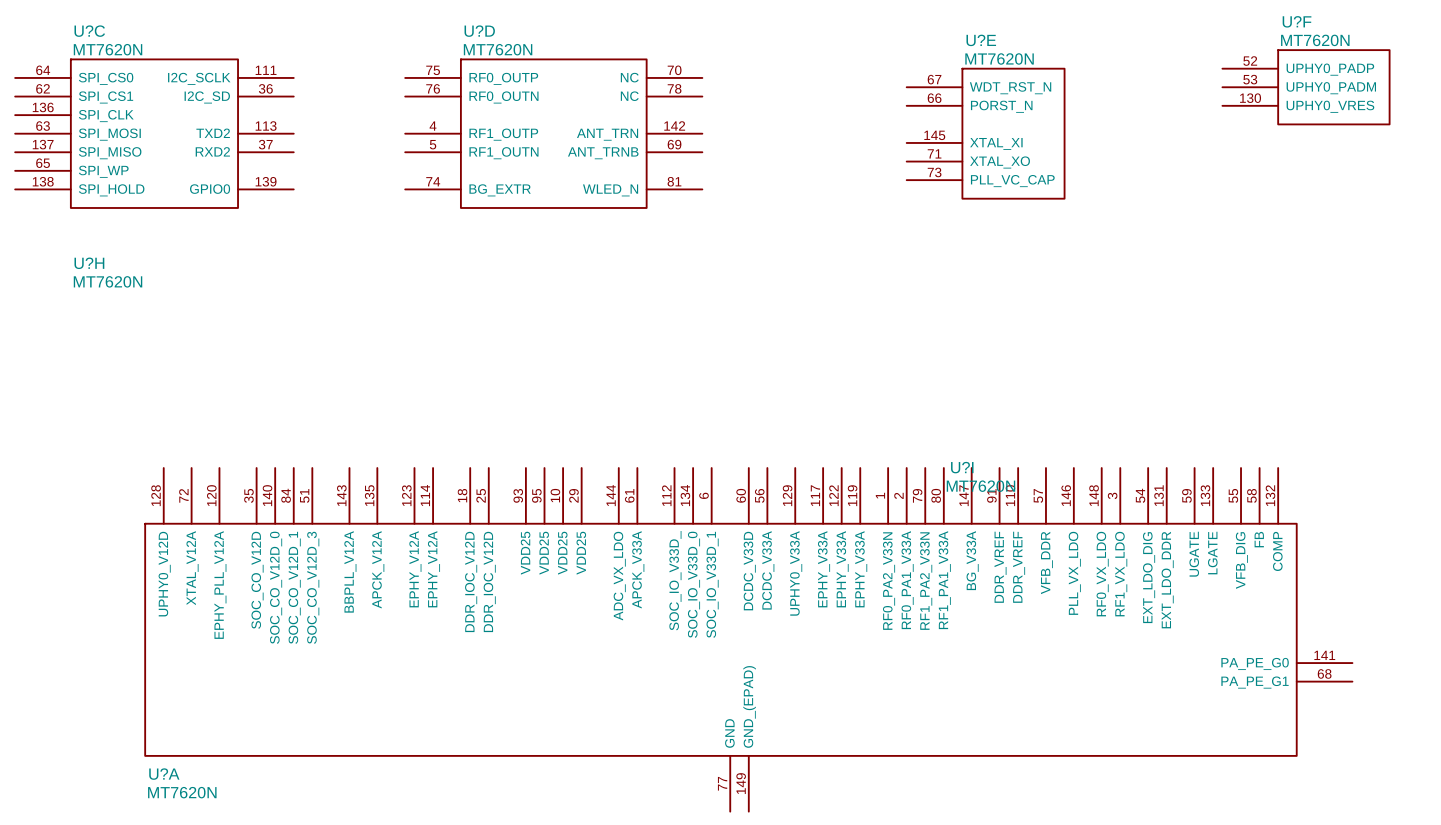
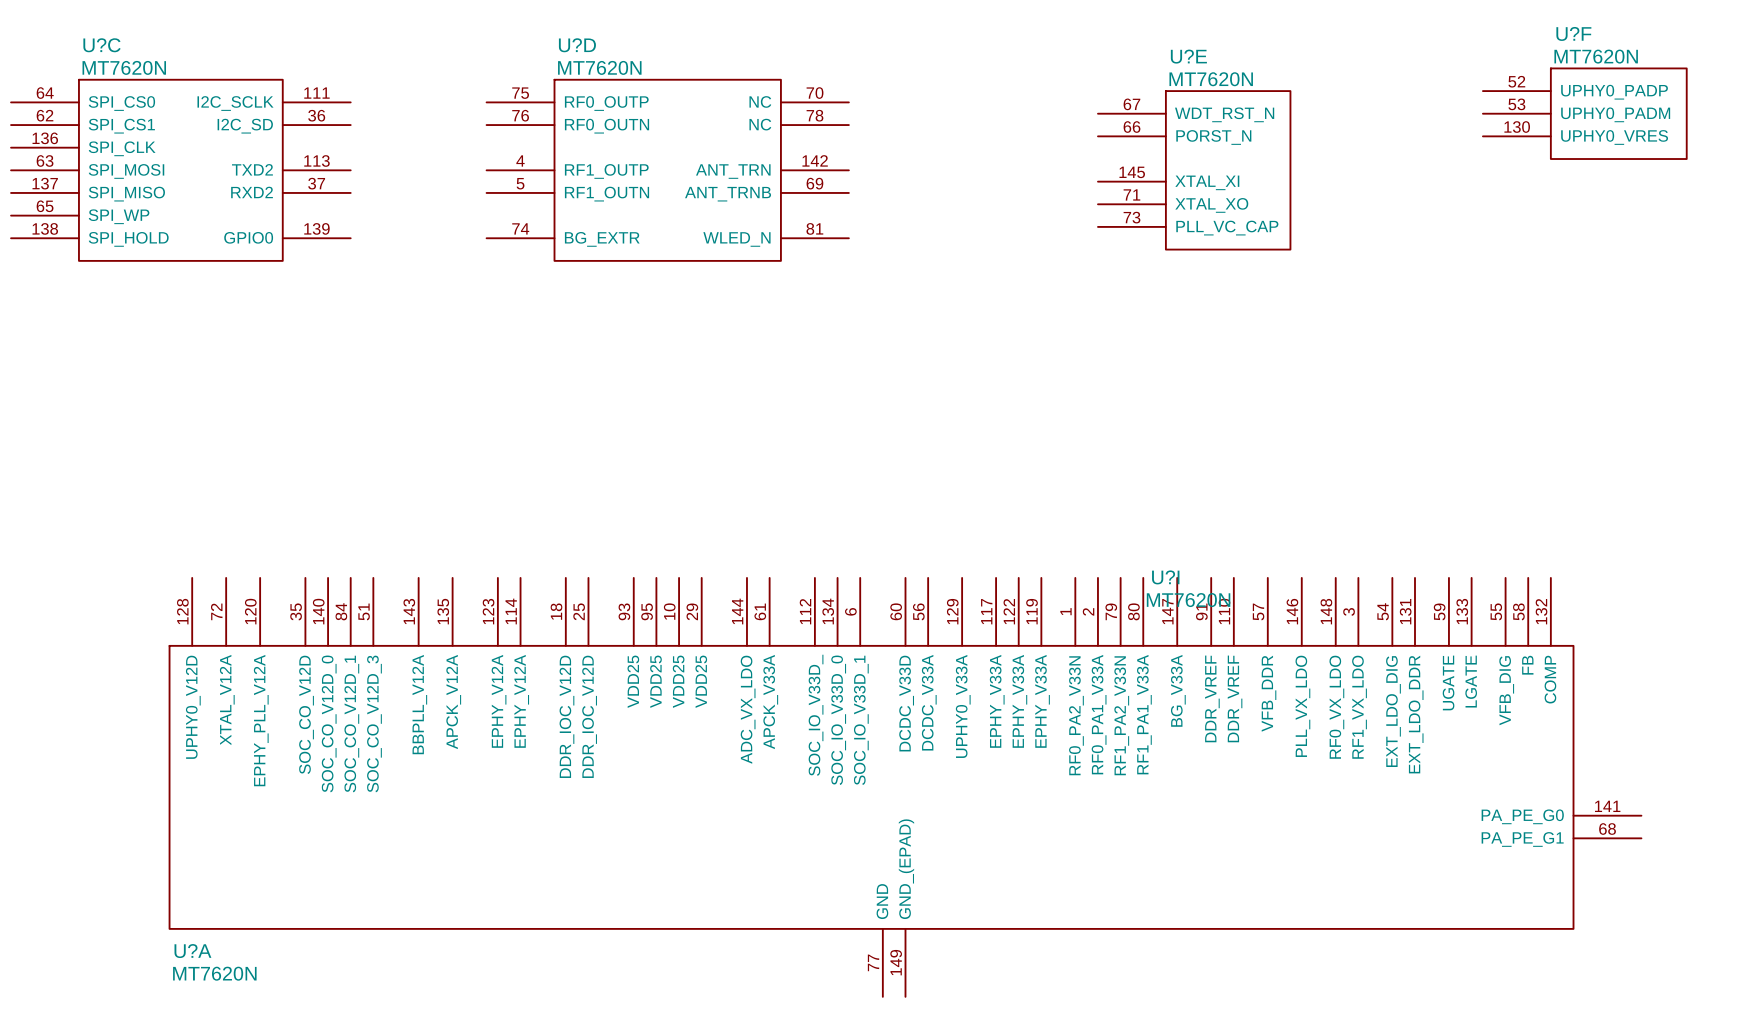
U?H: MT7620N (108, 272) -> none

